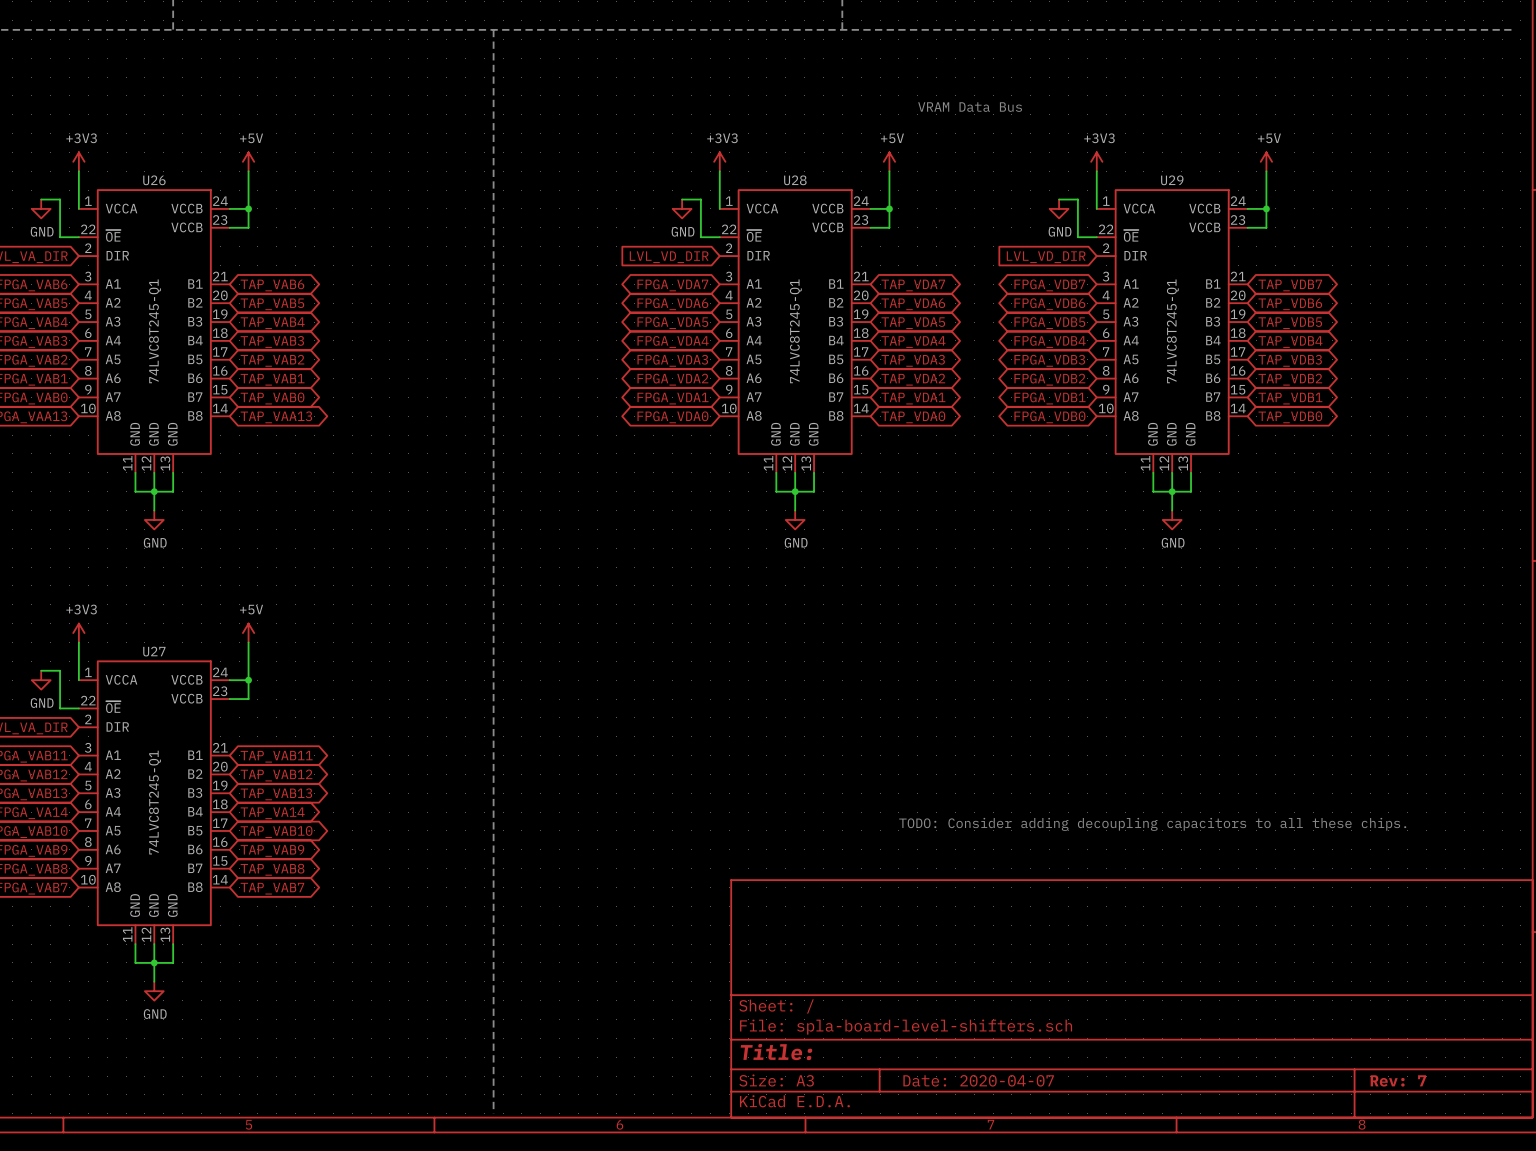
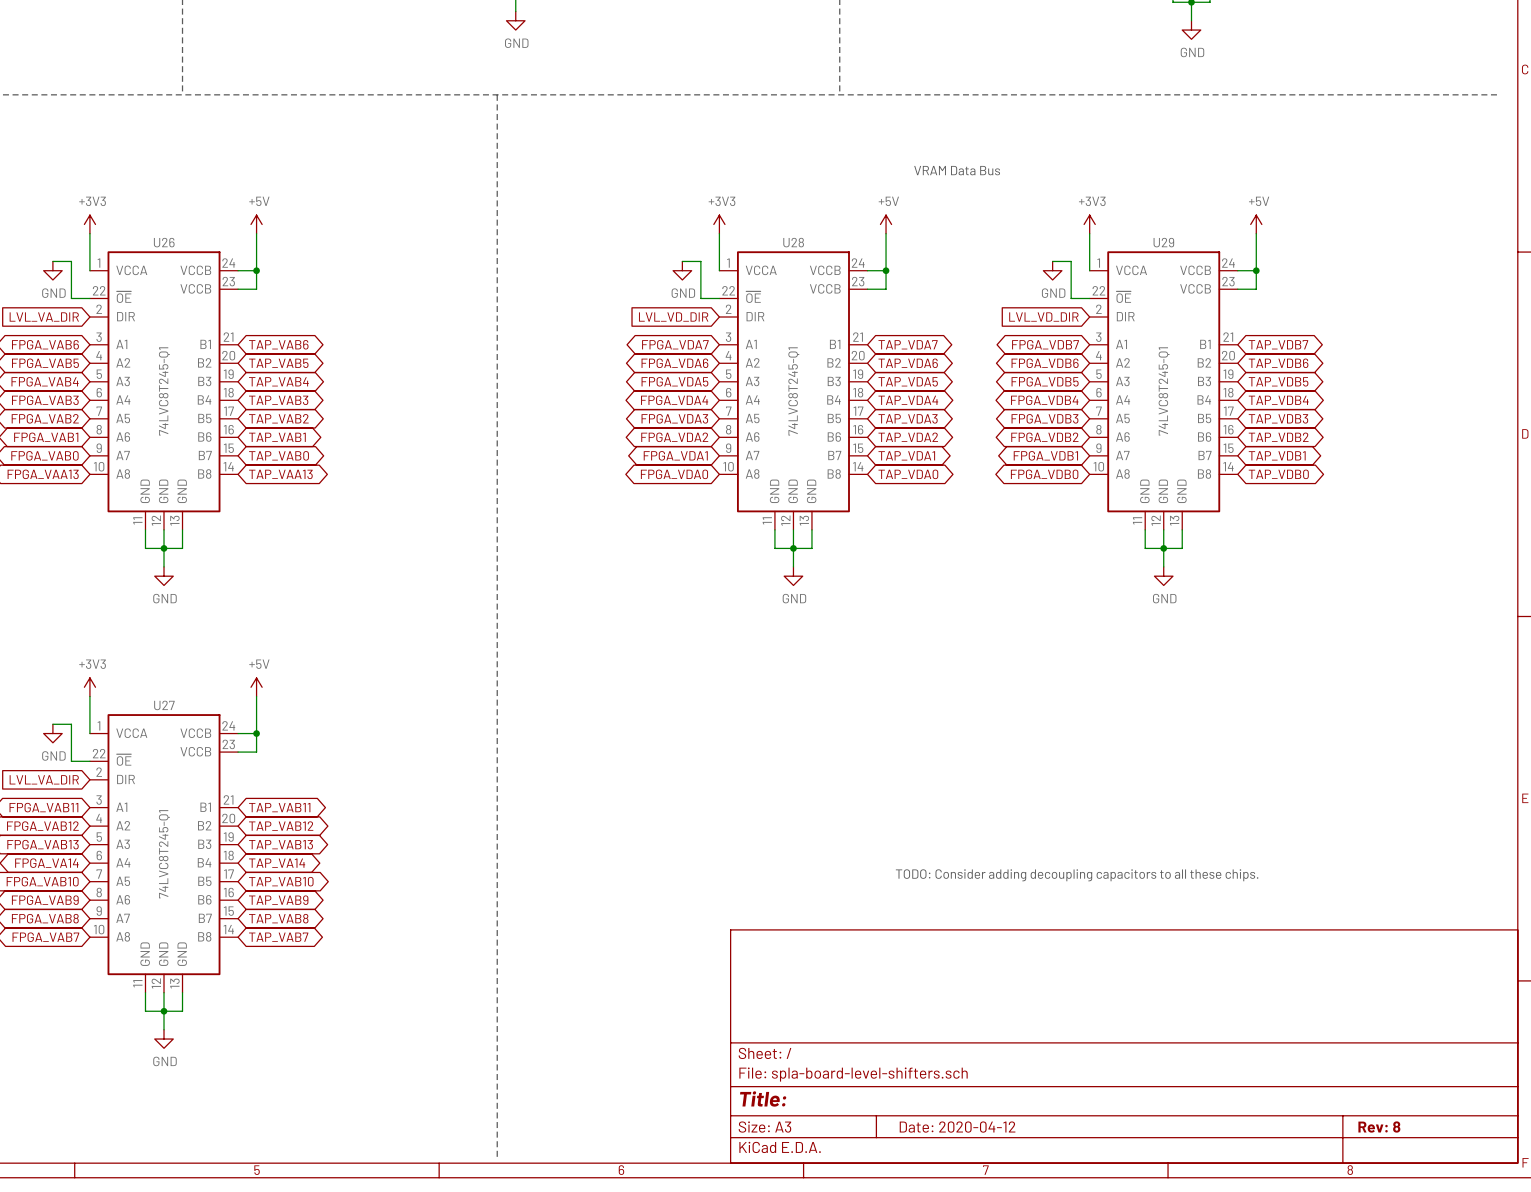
title block: Date: 2020-04-07 (978, 1080) -> Date: 2020-04-12 (957, 1127)
title block: Rev: 7 (1398, 1080) -> Rev: 8 (1379, 1127)

